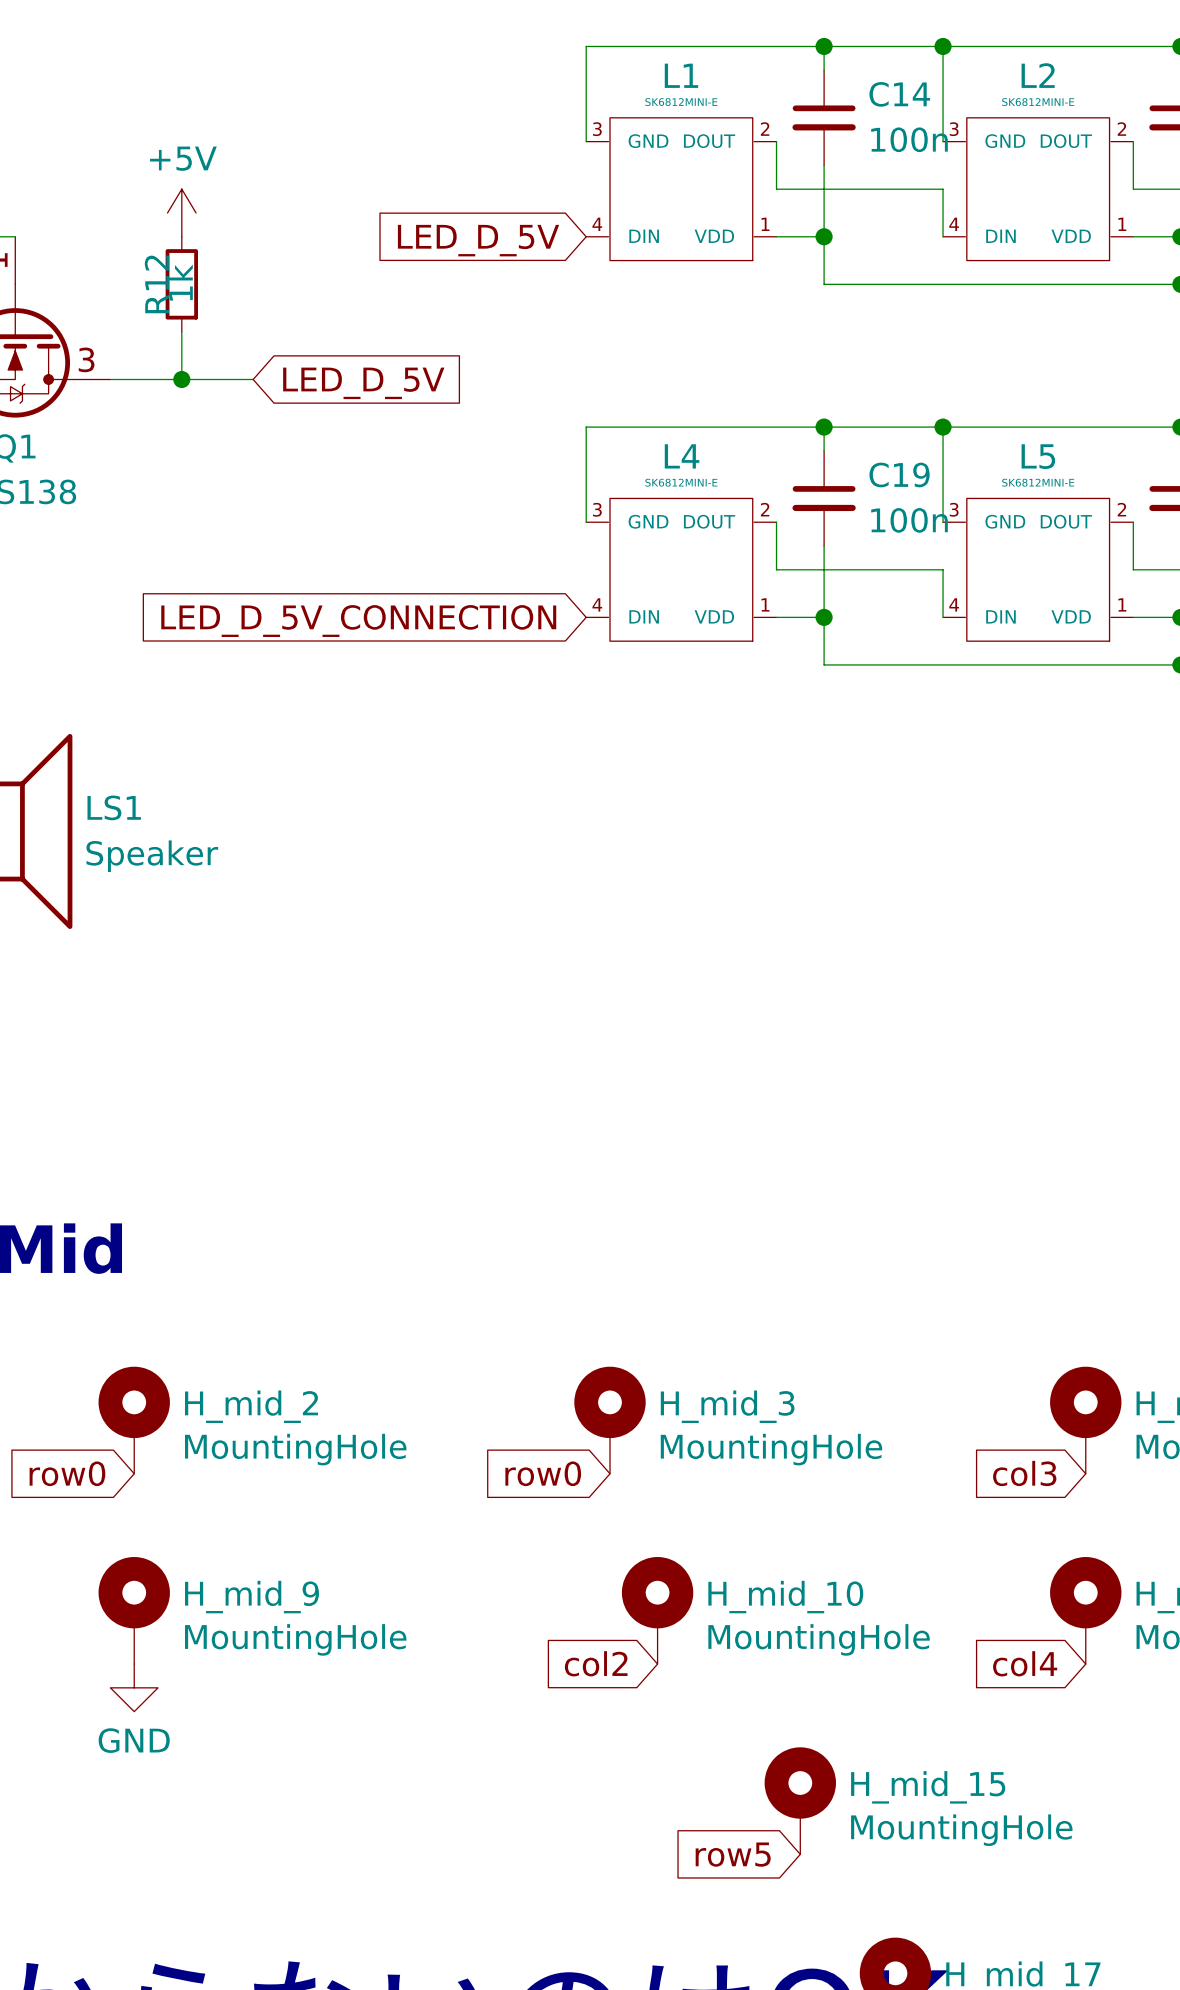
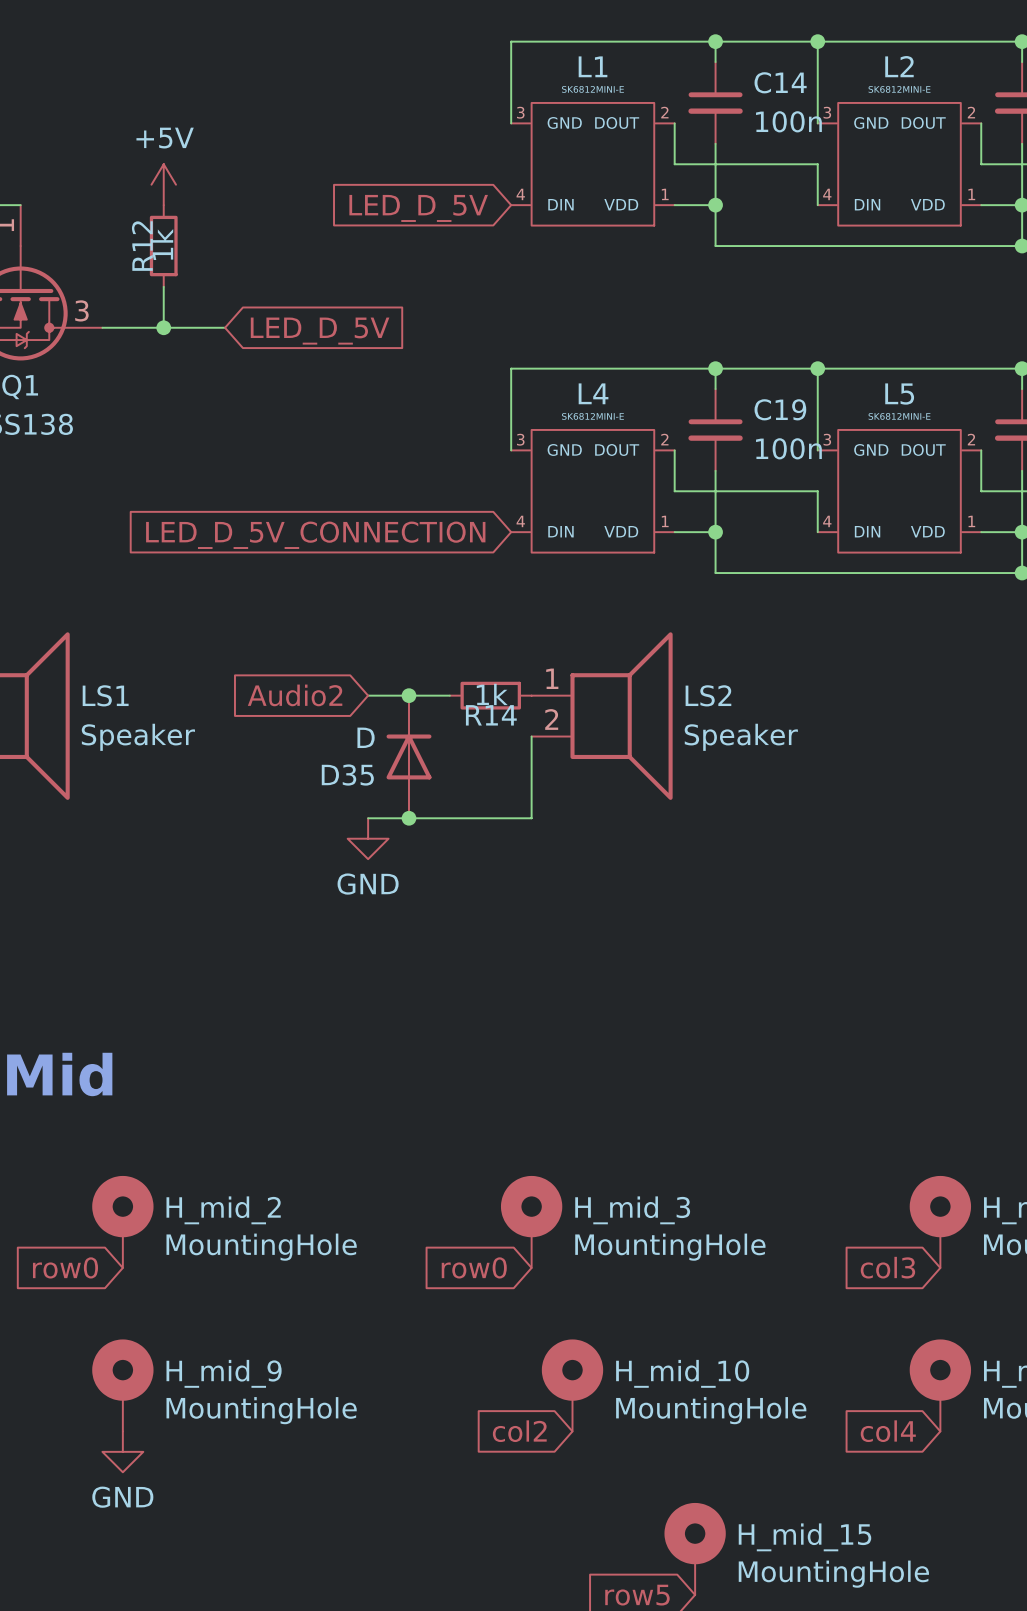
global label: none -> Audio2 (295, 695)
wire: none -> (368, 695) (449, 695)
junction: none -> (408, 695)
R14: none -> 1k (490, 695)
LS2: none -> Speaker (602, 716)
wire: none -> (531, 736) (531, 818) (368, 818)
D35: none -> D (408, 756)
junction: none -> (408, 818)
power symbol: none -> GND (368, 838)

